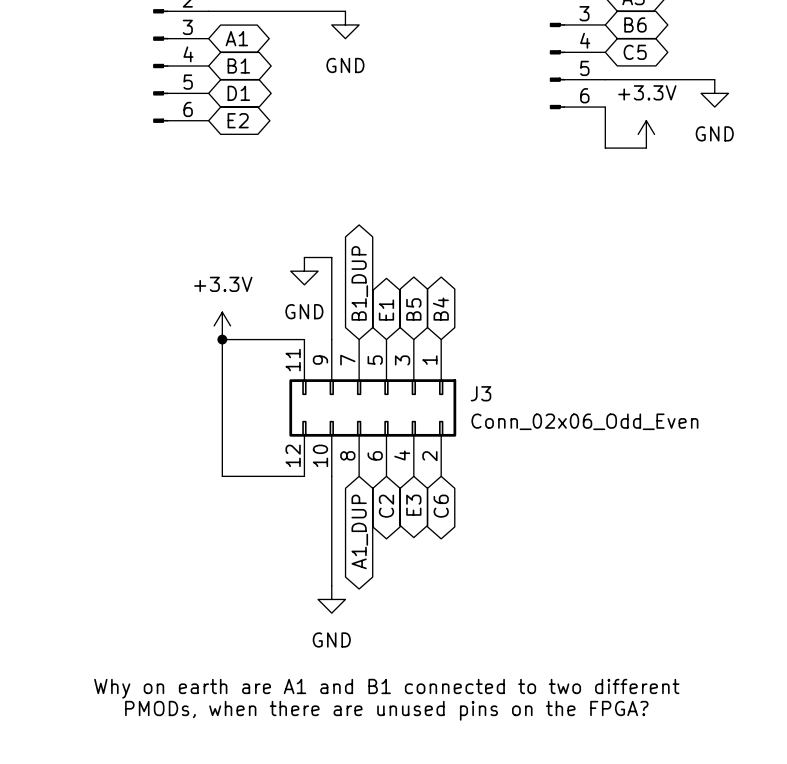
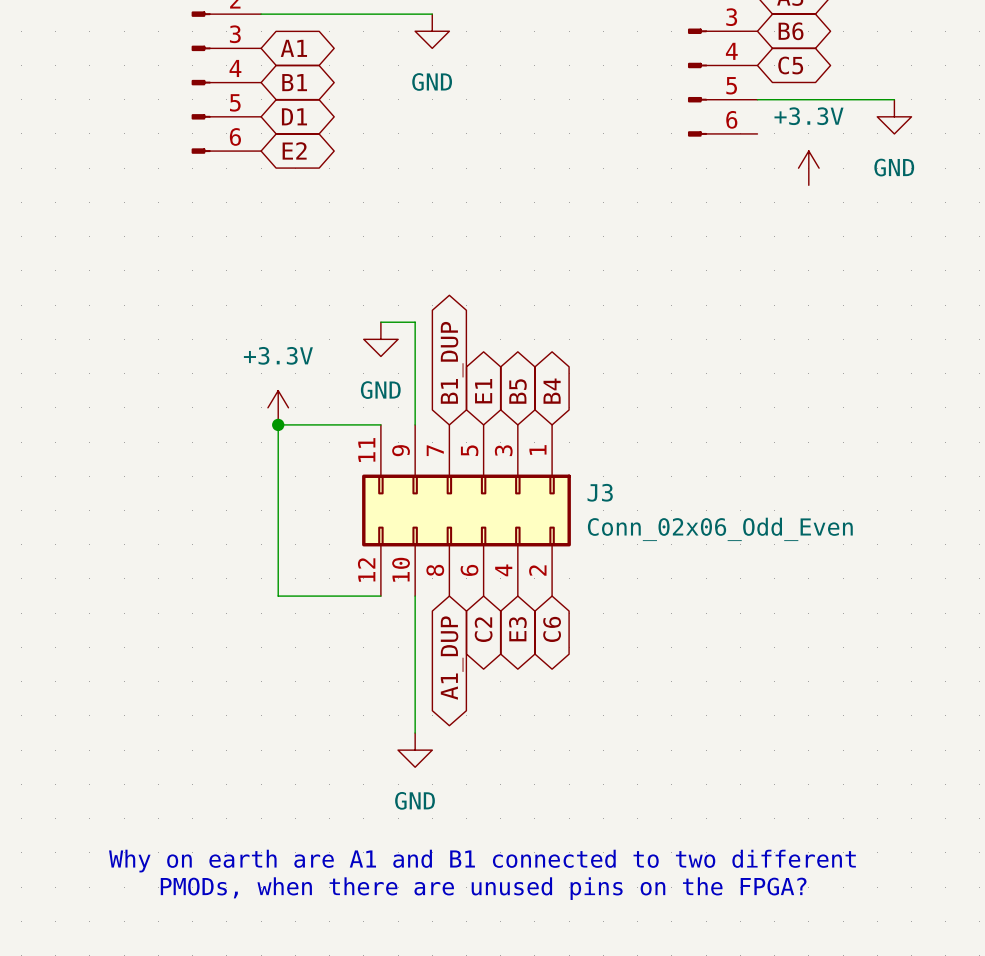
wire: (605, 107) (605, 148) (646, 148) -> none

